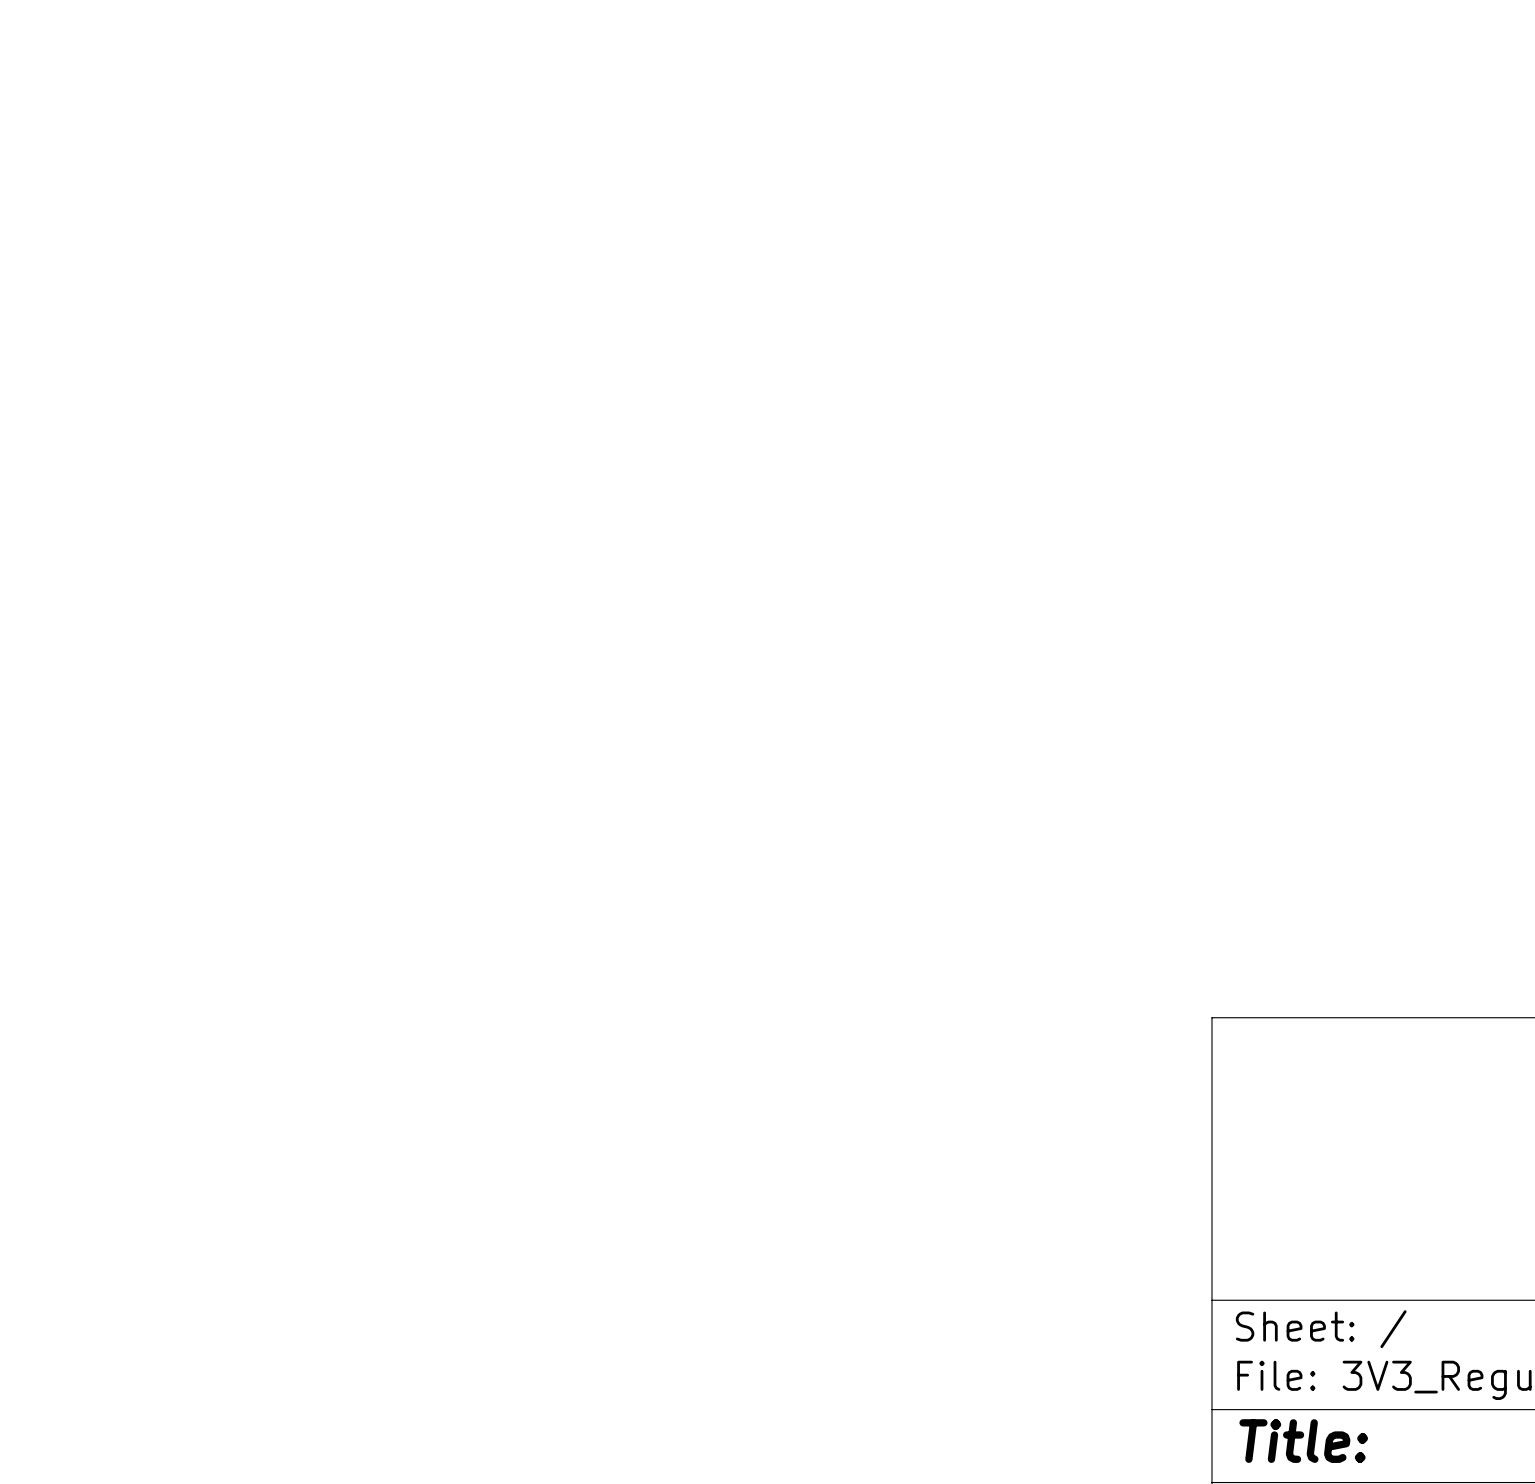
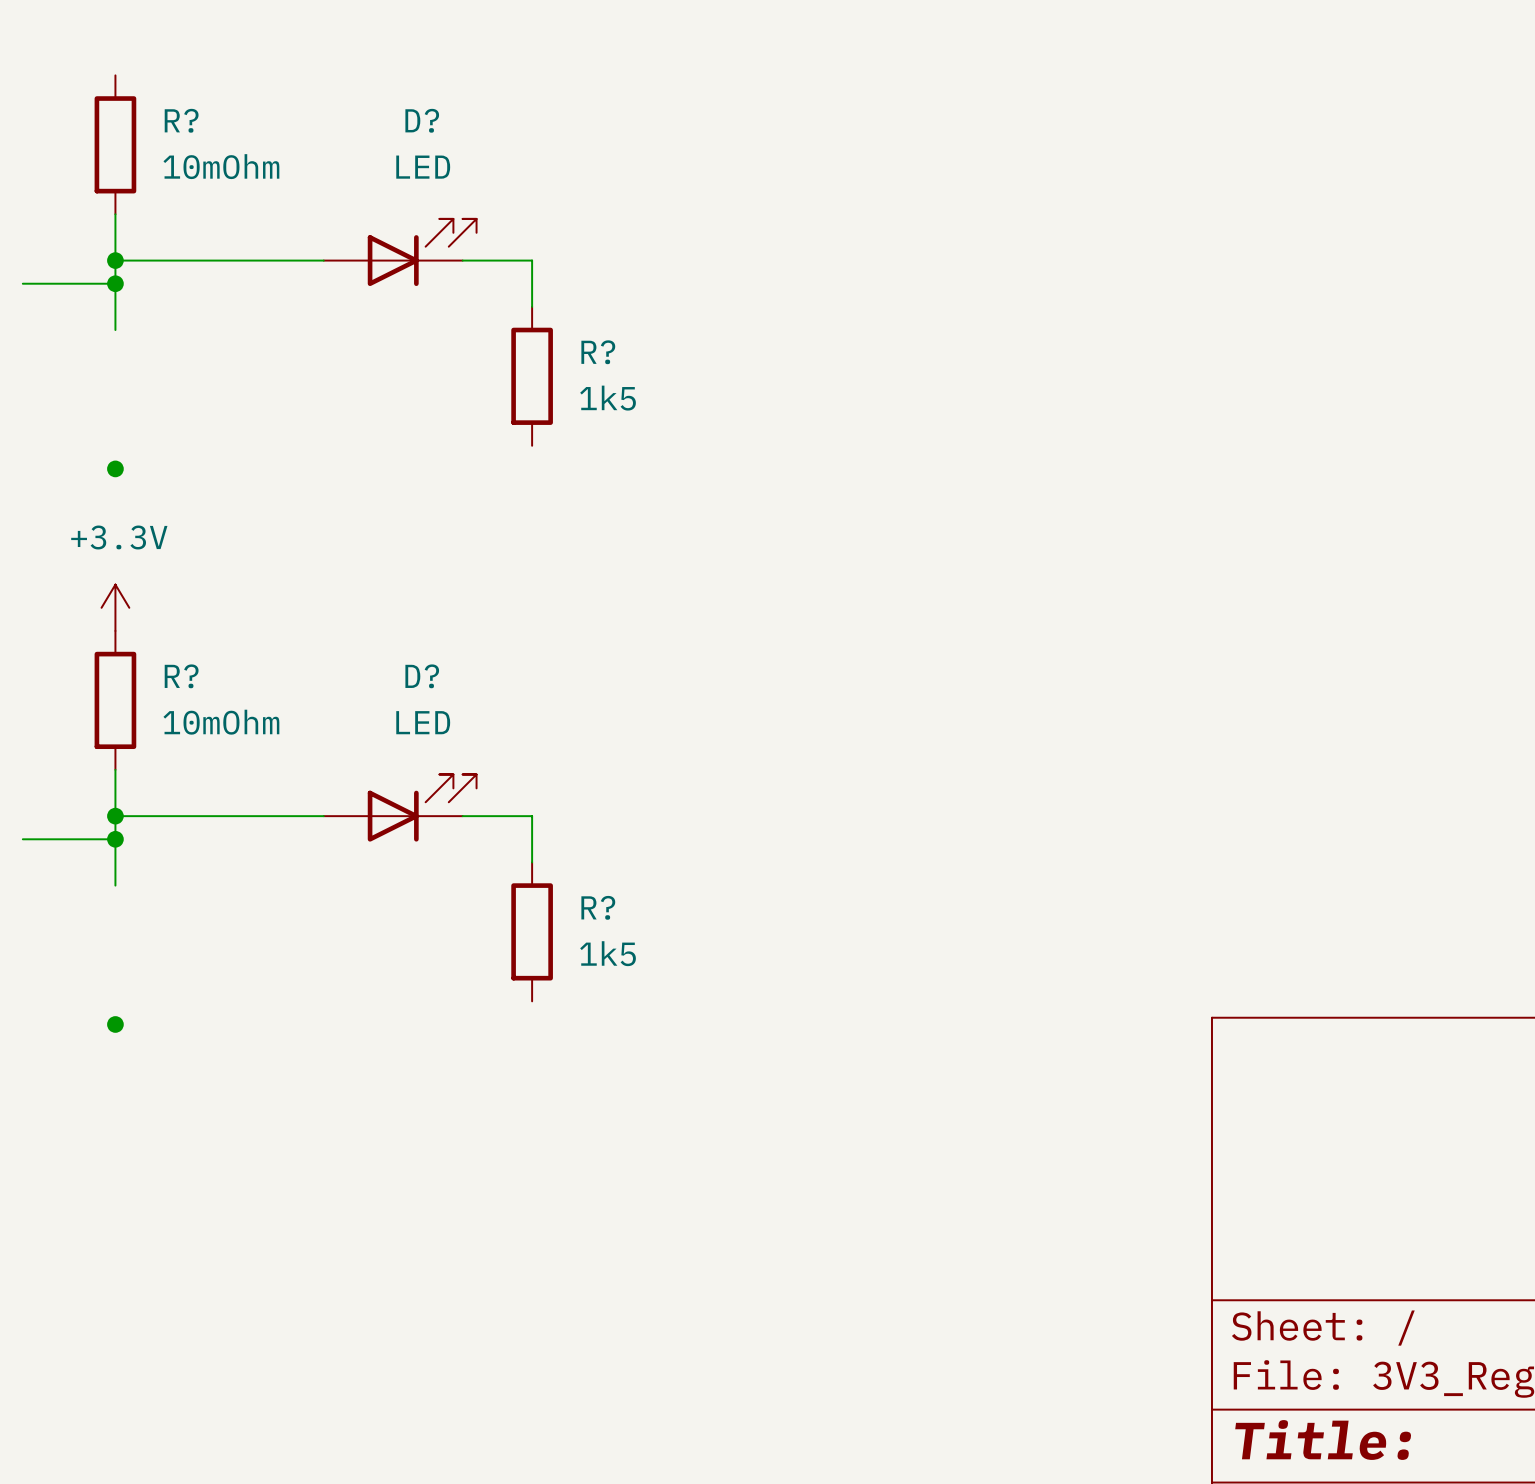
R?: none -> 10mOhm (115, 144)
wire: none -> (115, 214) (115, 330)
D?: none -> LED (400, 252)
wire: none -> (115, 260) (323, 260)
junction: none -> (115, 260)
wire: none -> (462, 260) (532, 260) (532, 306)
wire: none -> (22, 283) (115, 283)
junction: none -> (115, 283)
R?: none -> 1k5 (532, 376)
junction: none -> (115, 468)
power symbol: none -> +3.3V (115, 607)
R?: none -> 10mOhm (115, 700)
wire: none -> (115, 769) (115, 885)
D?: none -> LED (400, 808)
wire: none -> (115, 816) (323, 816)
junction: none -> (115, 816)
wire: none -> (462, 816) (532, 816) (532, 862)
wire: none -> (22, 839) (115, 839)
junction: none -> (115, 839)
R?: none -> 1k5 (532, 931)
junction: none -> (115, 1024)

